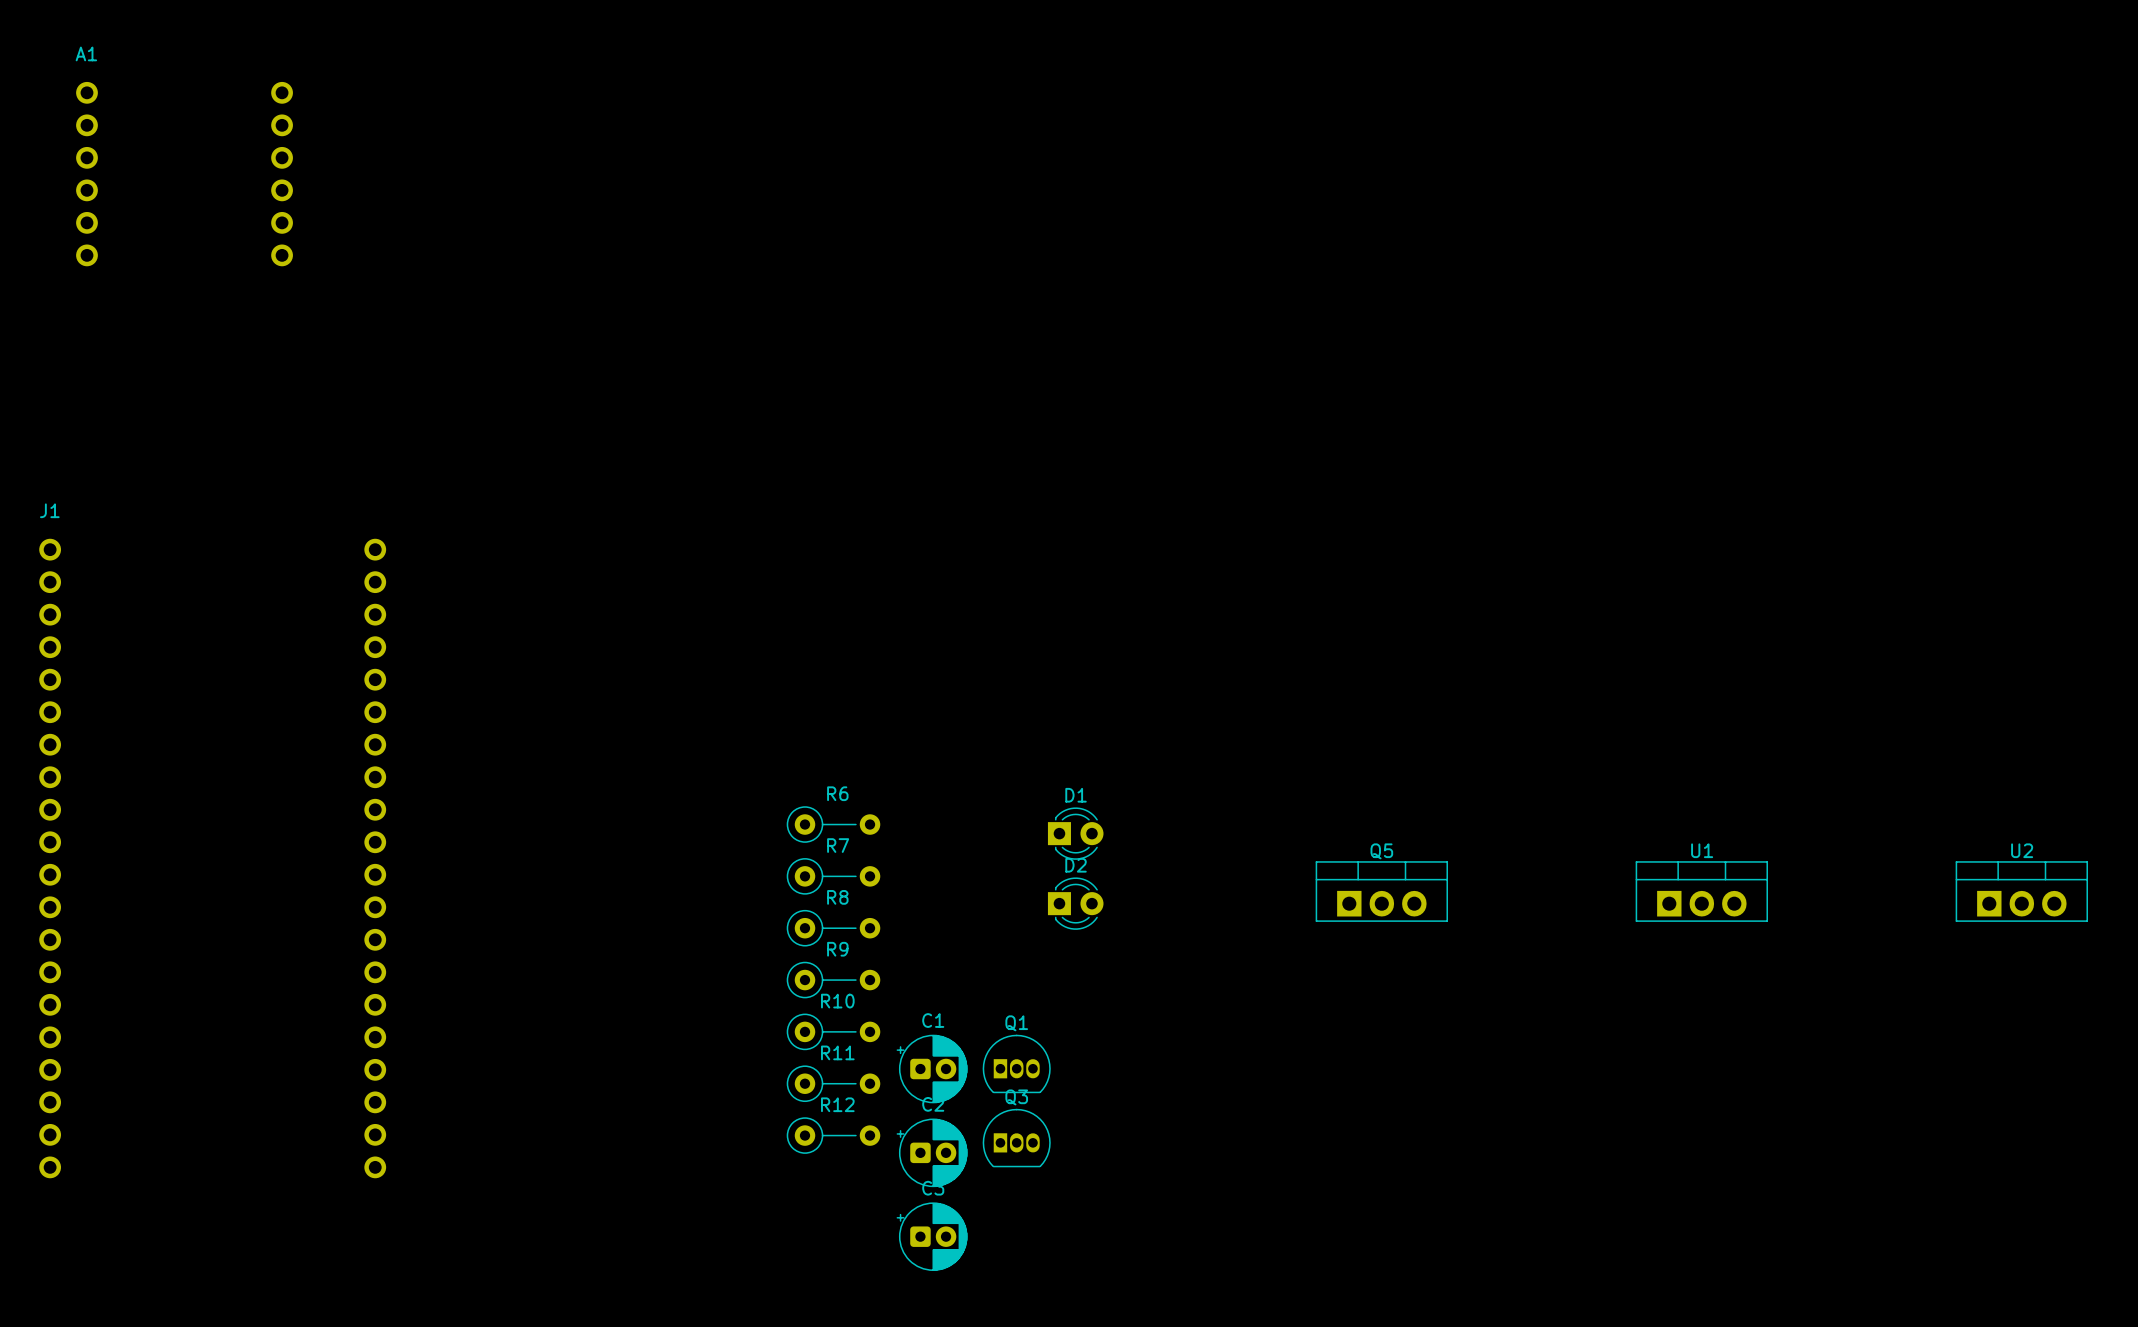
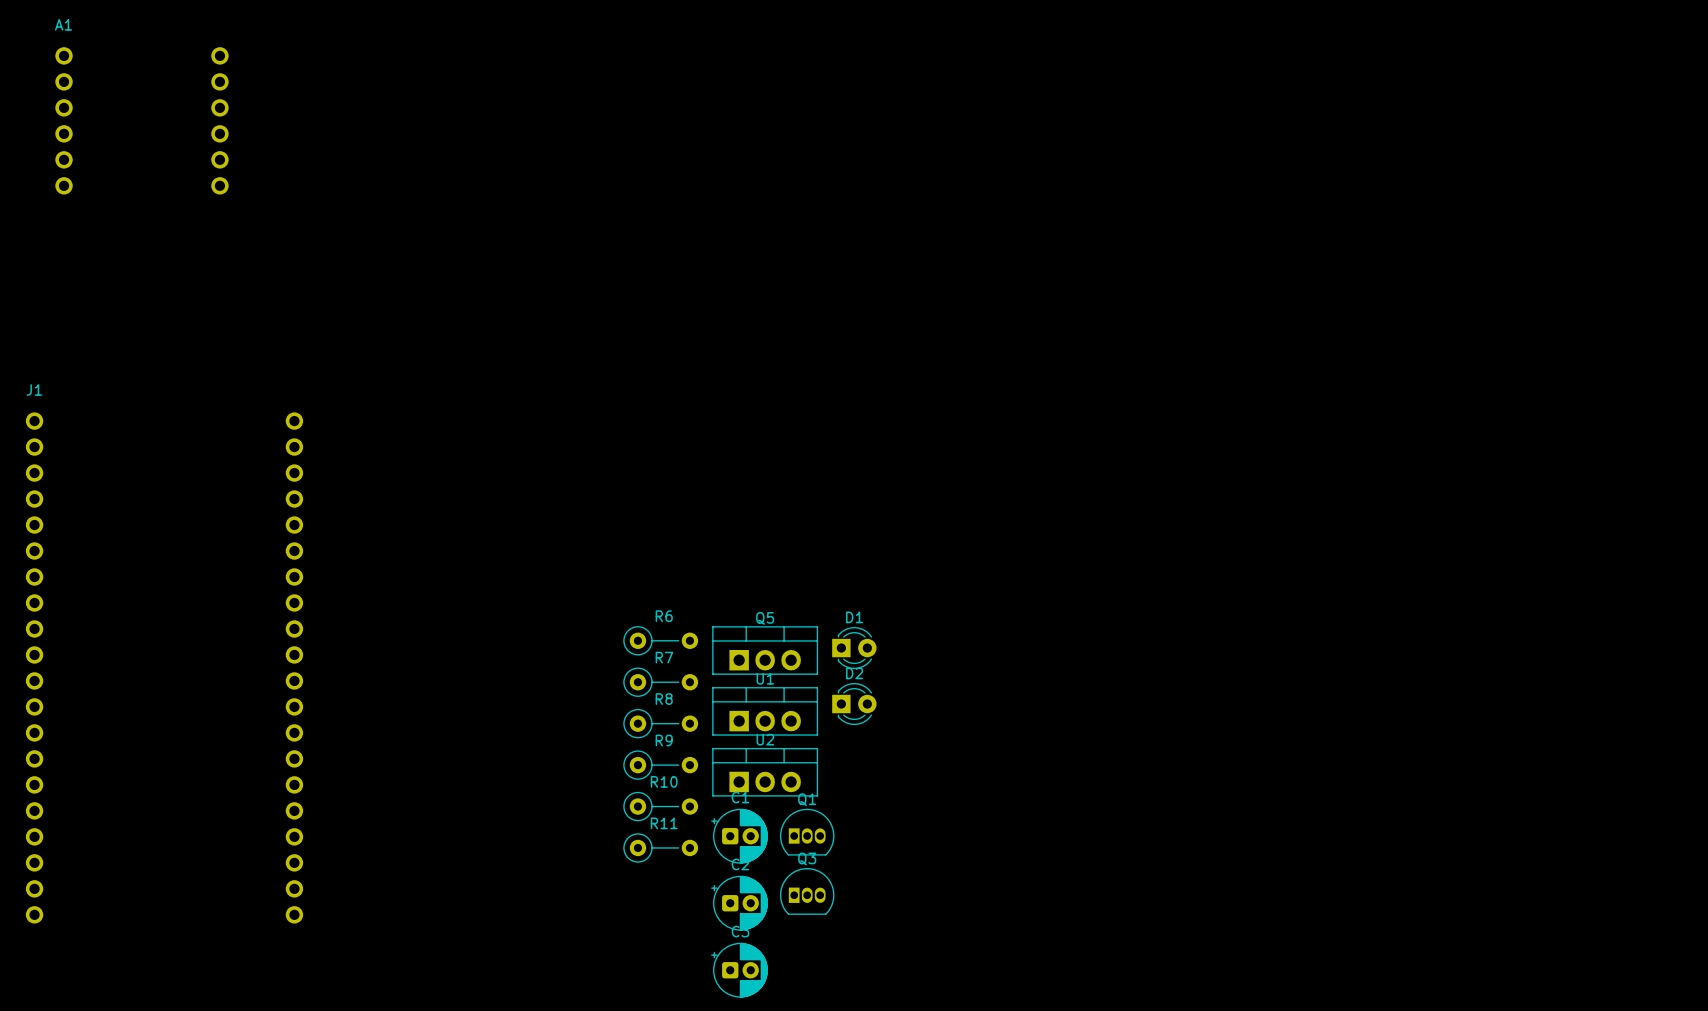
Q5 position: (1381, 891) -> (765, 650)
U1 position: (1701, 891) -> (765, 711)
U2 position: (2021, 891) -> (765, 772)
R12: (833, 1135) -> none

